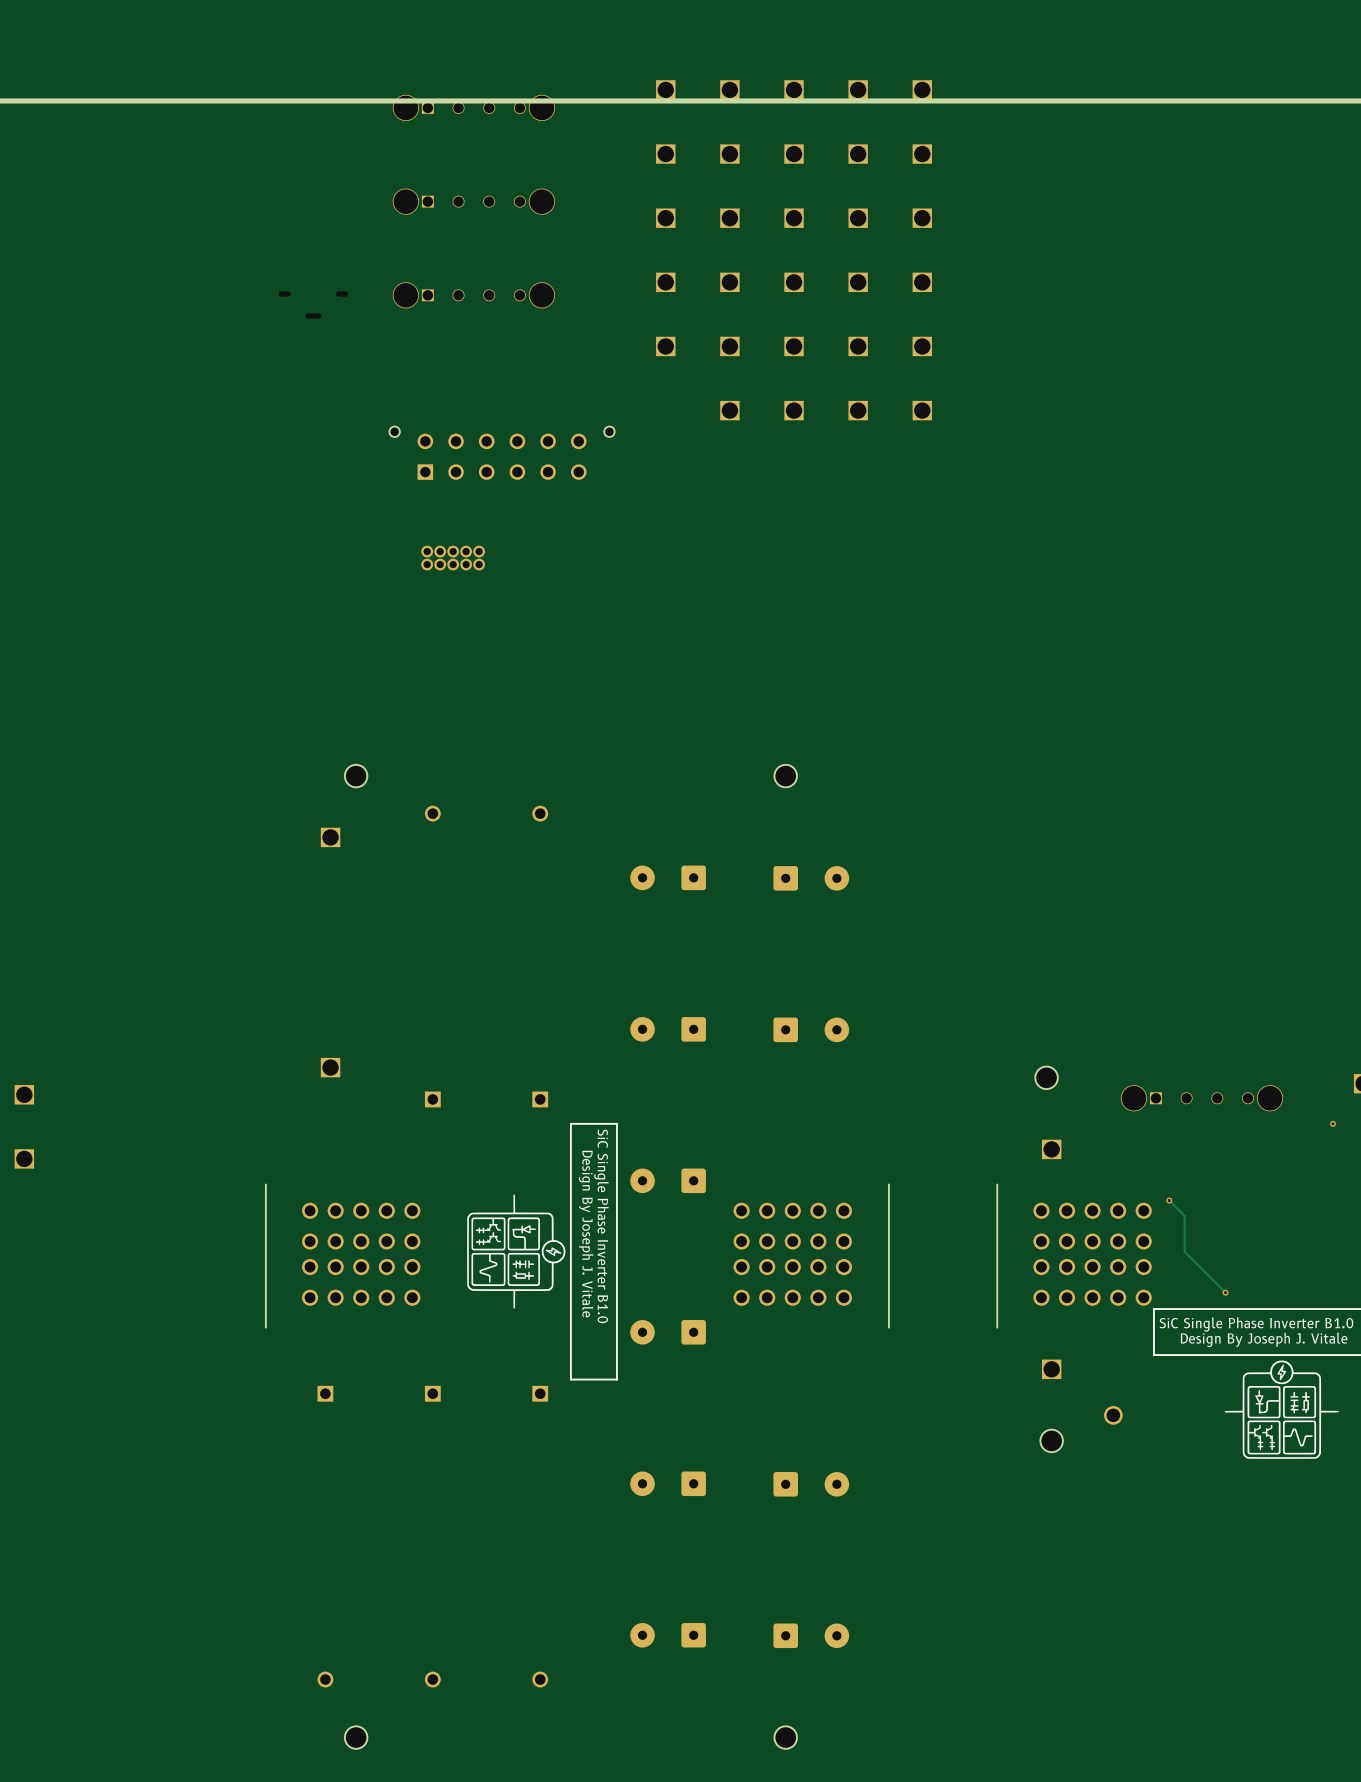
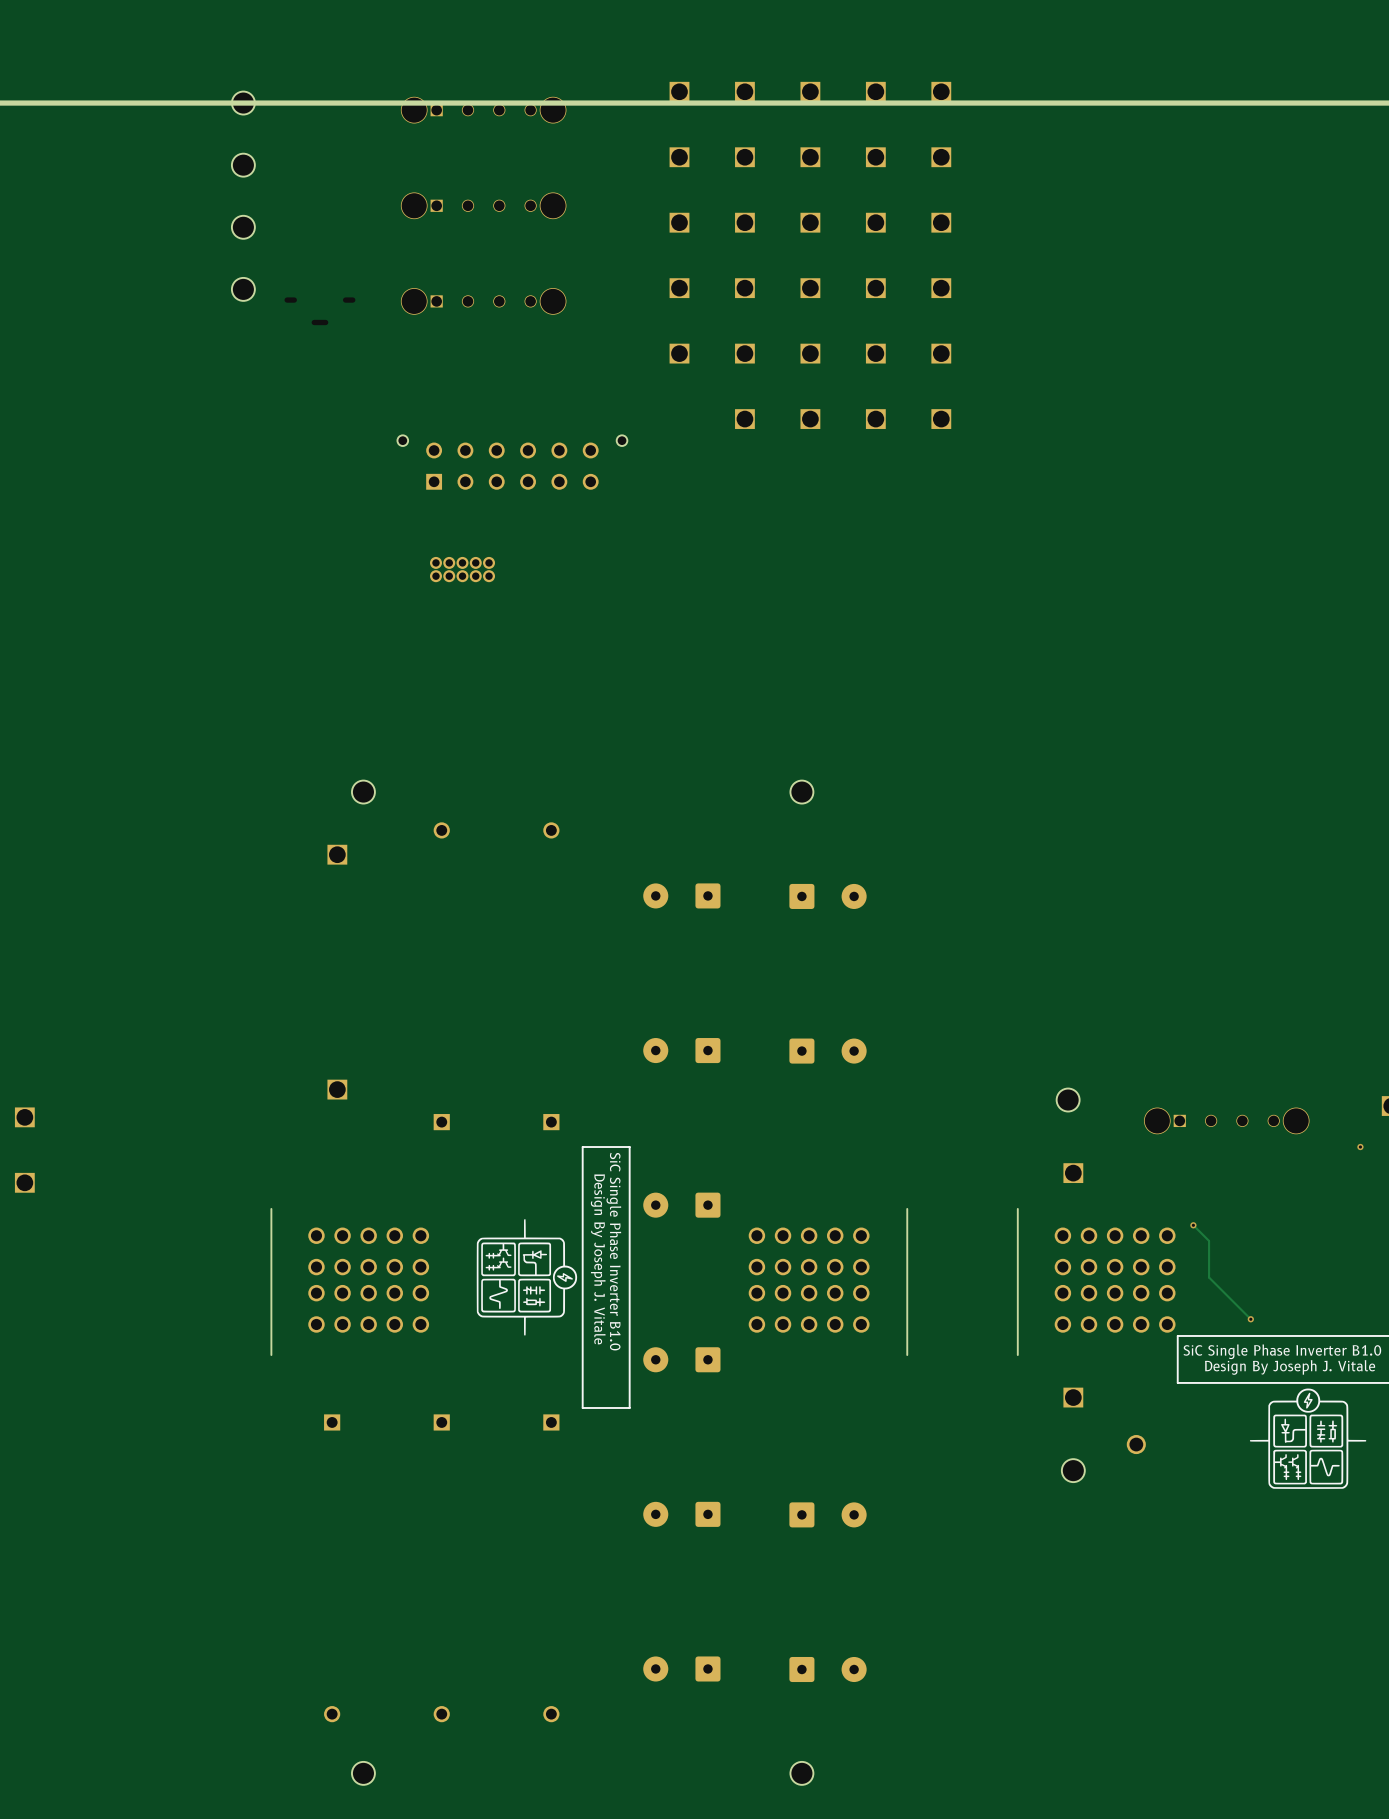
part: none -> (243, 103)
part: none -> (243, 165)
part: none -> (243, 227)
part: none -> (243, 289)

